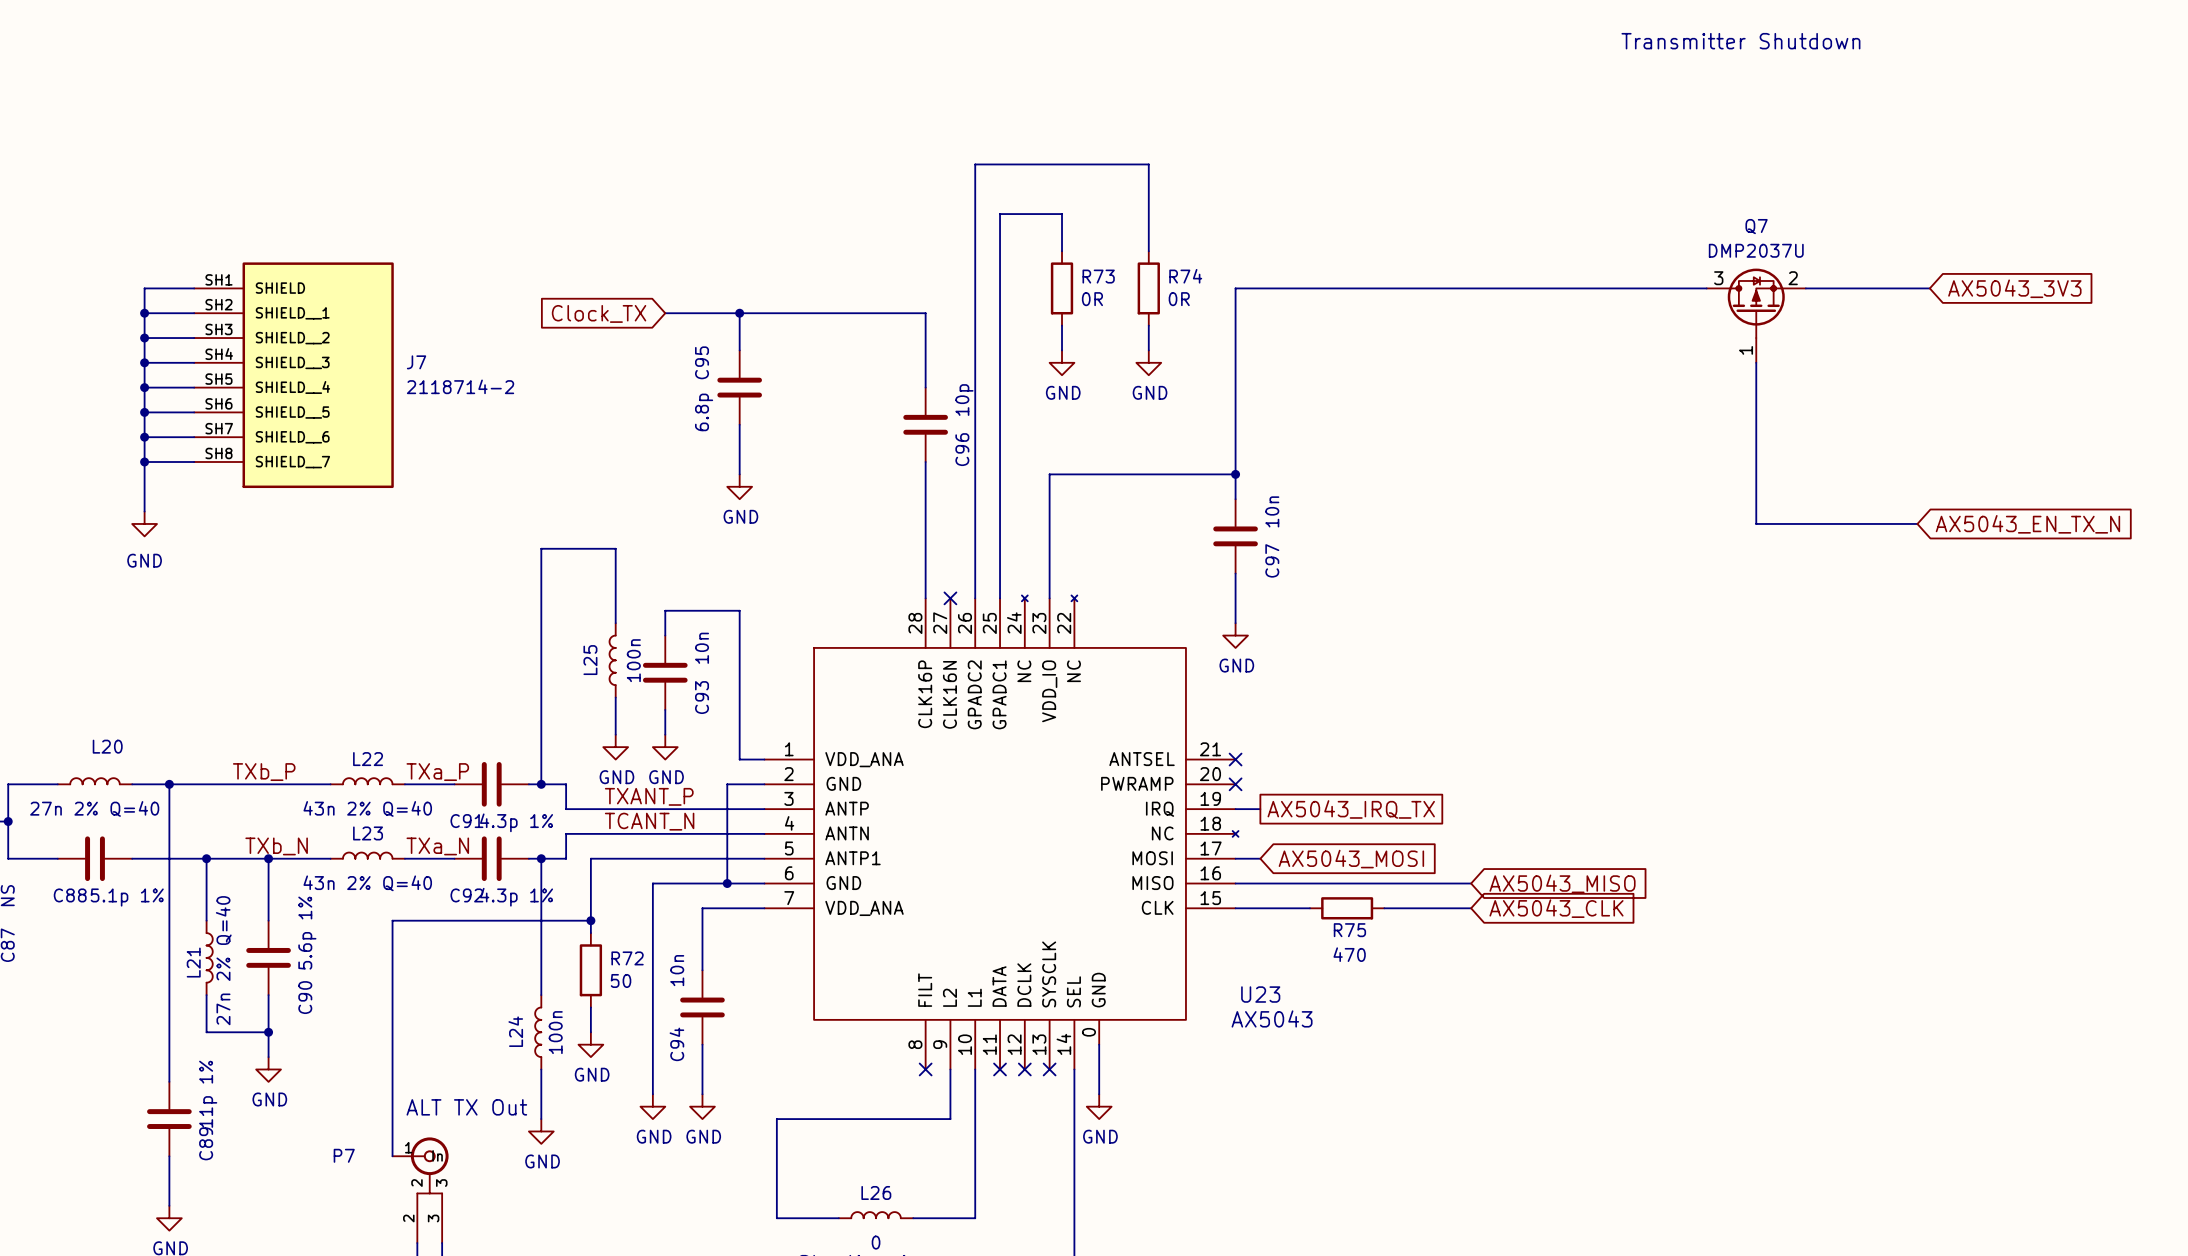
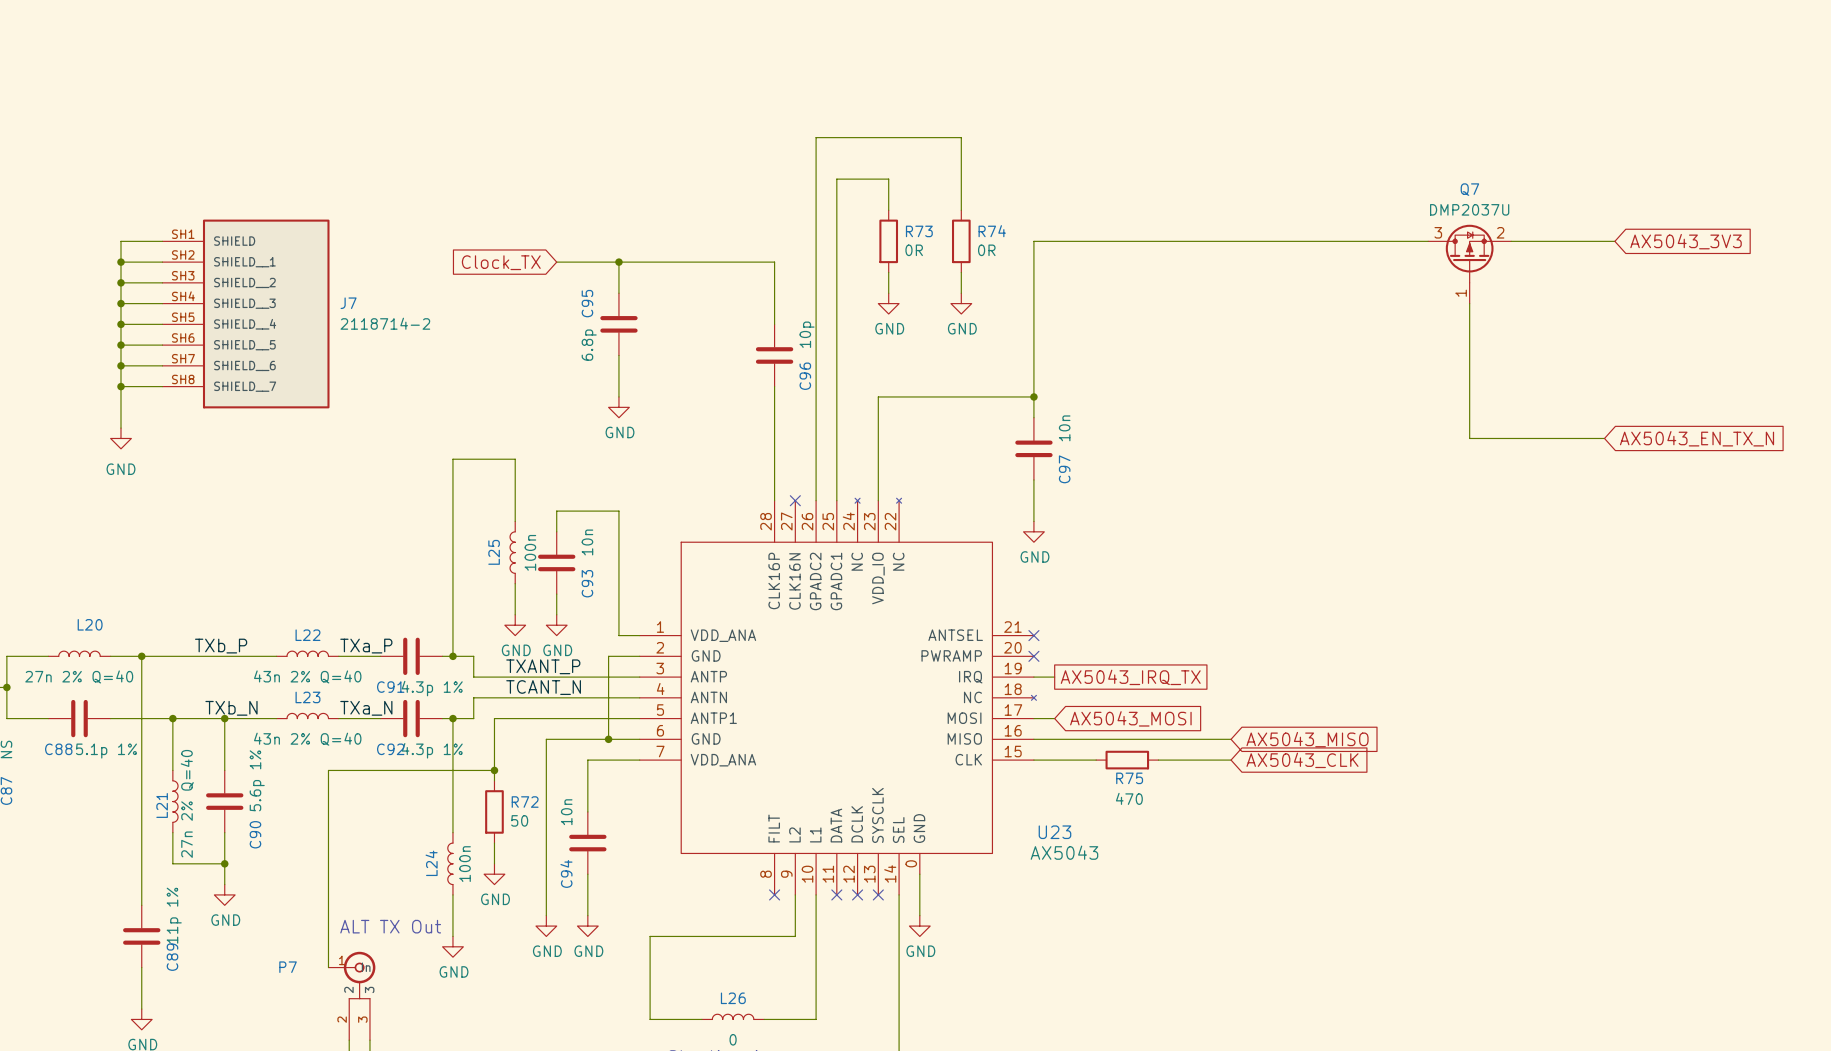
text: Transmitter Shutdown (1740, 41) -> none

